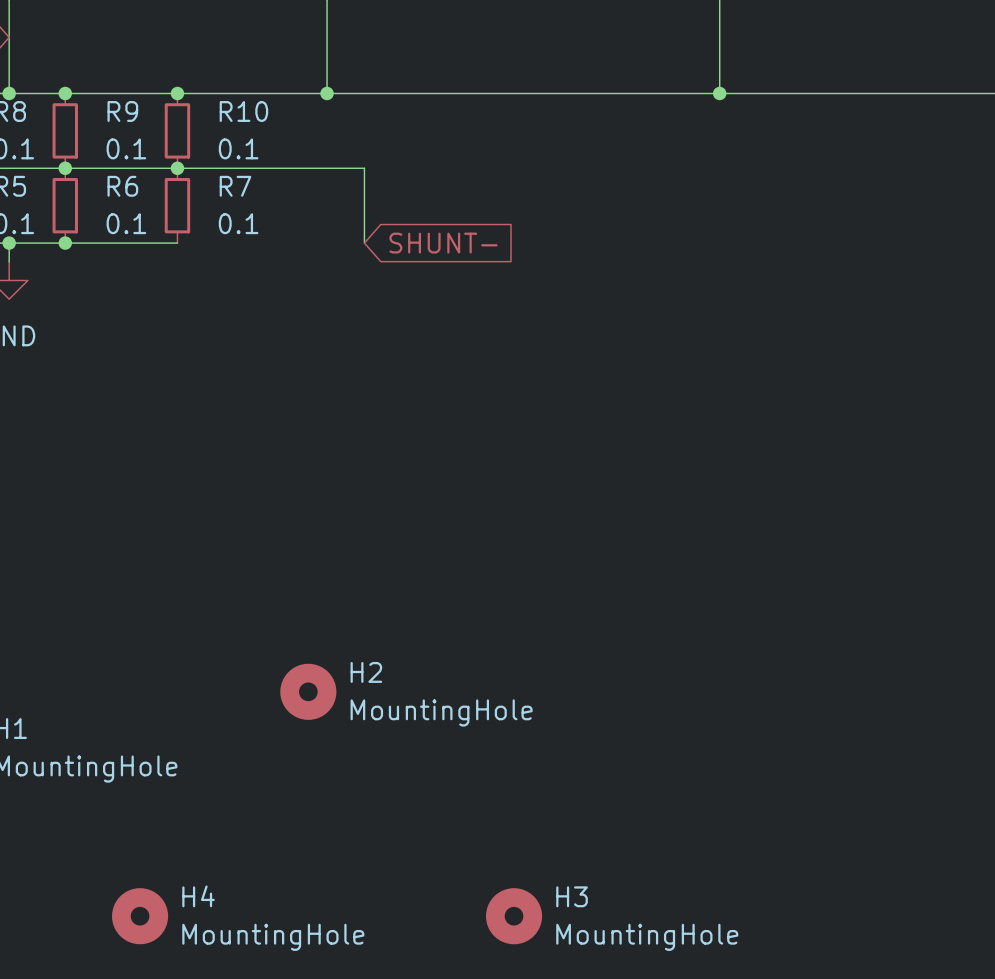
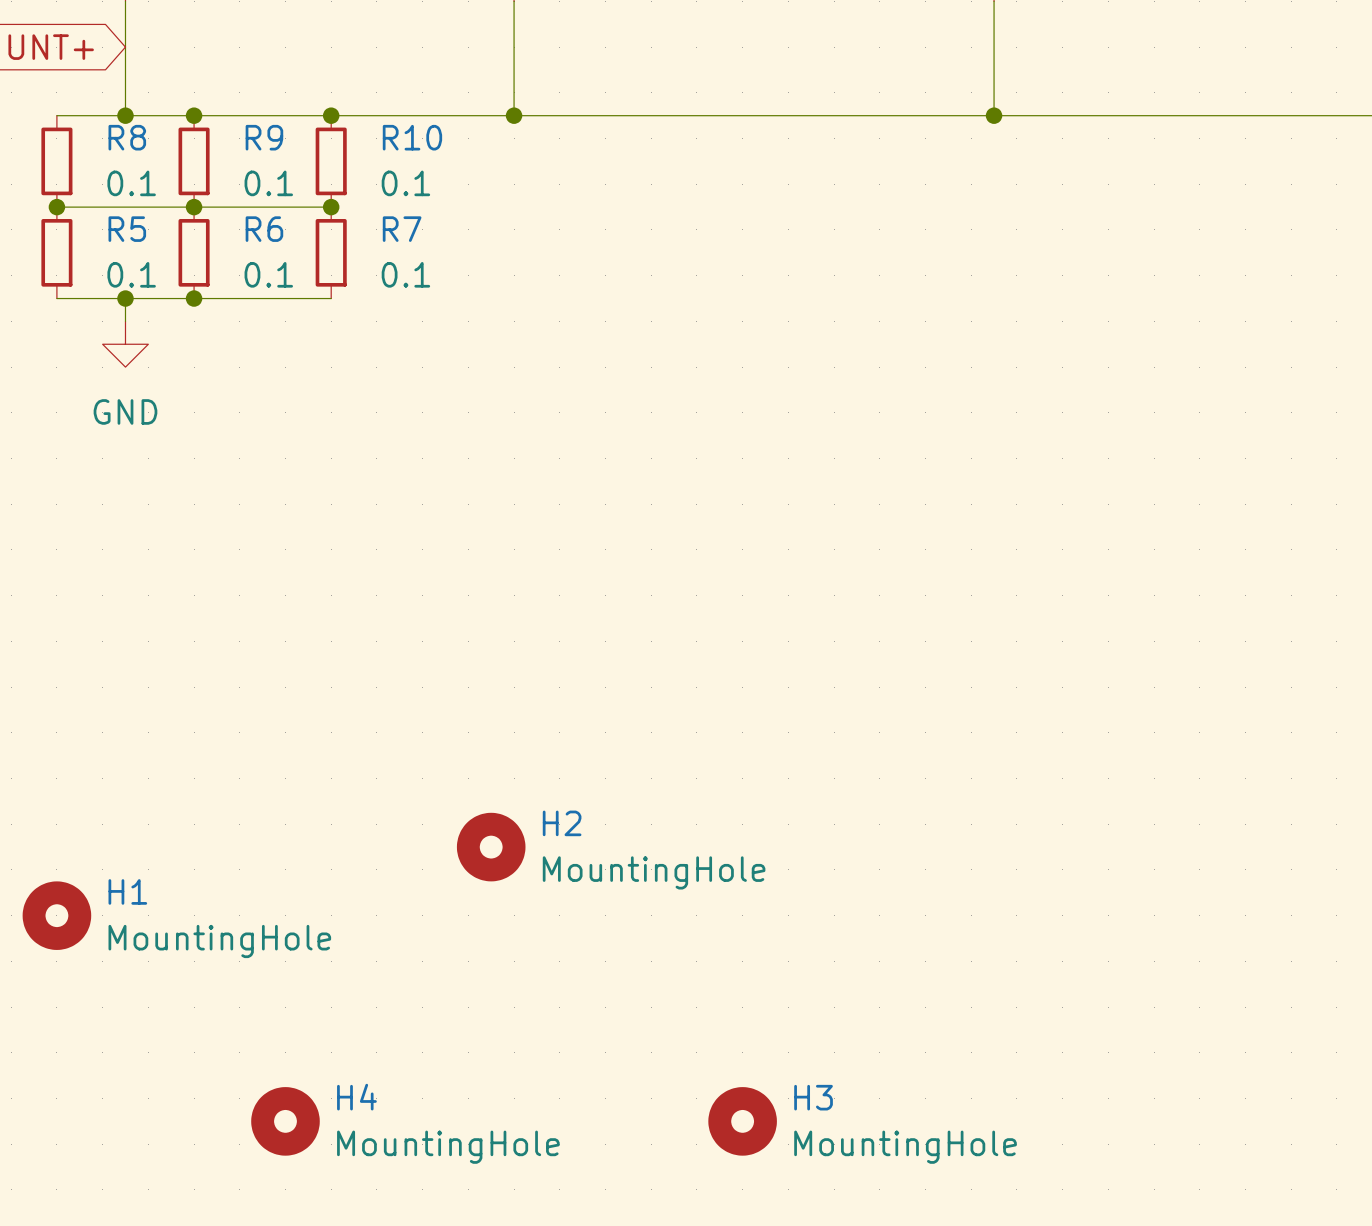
wire: (177, 168) (364, 168) (364, 243) -> none
global label: SHUNT- (443, 243) -> none

